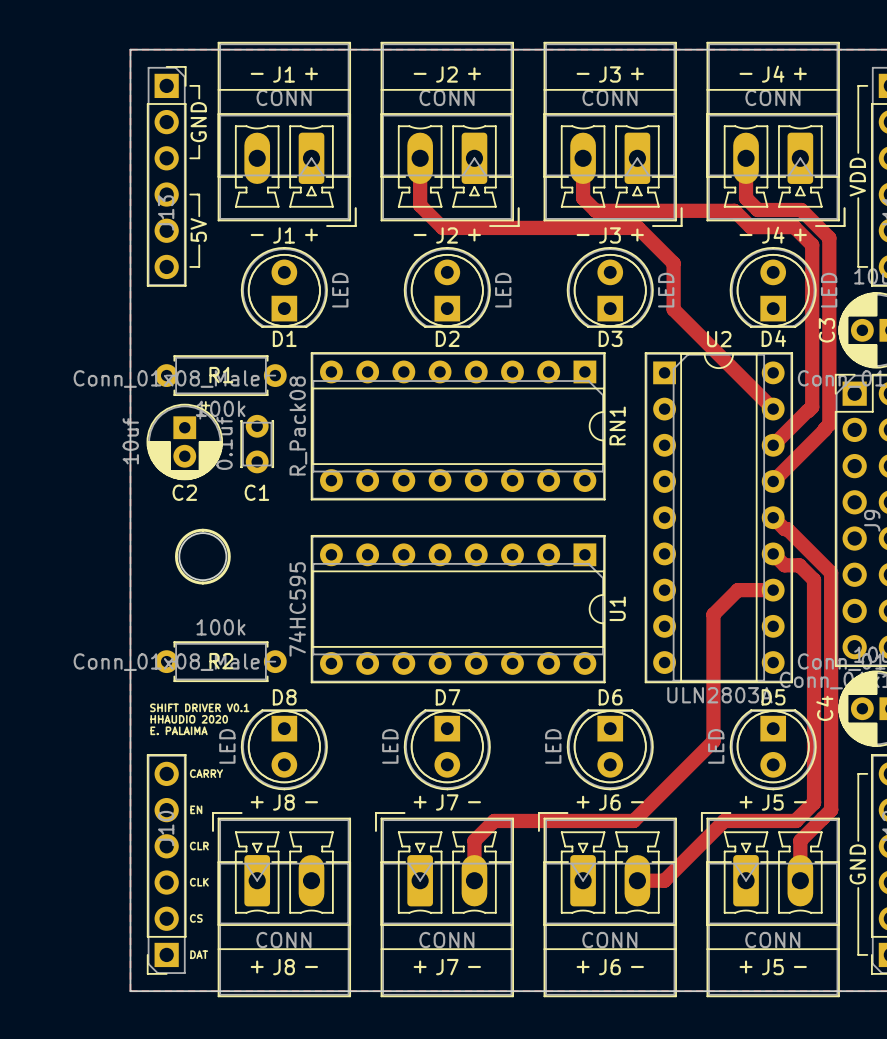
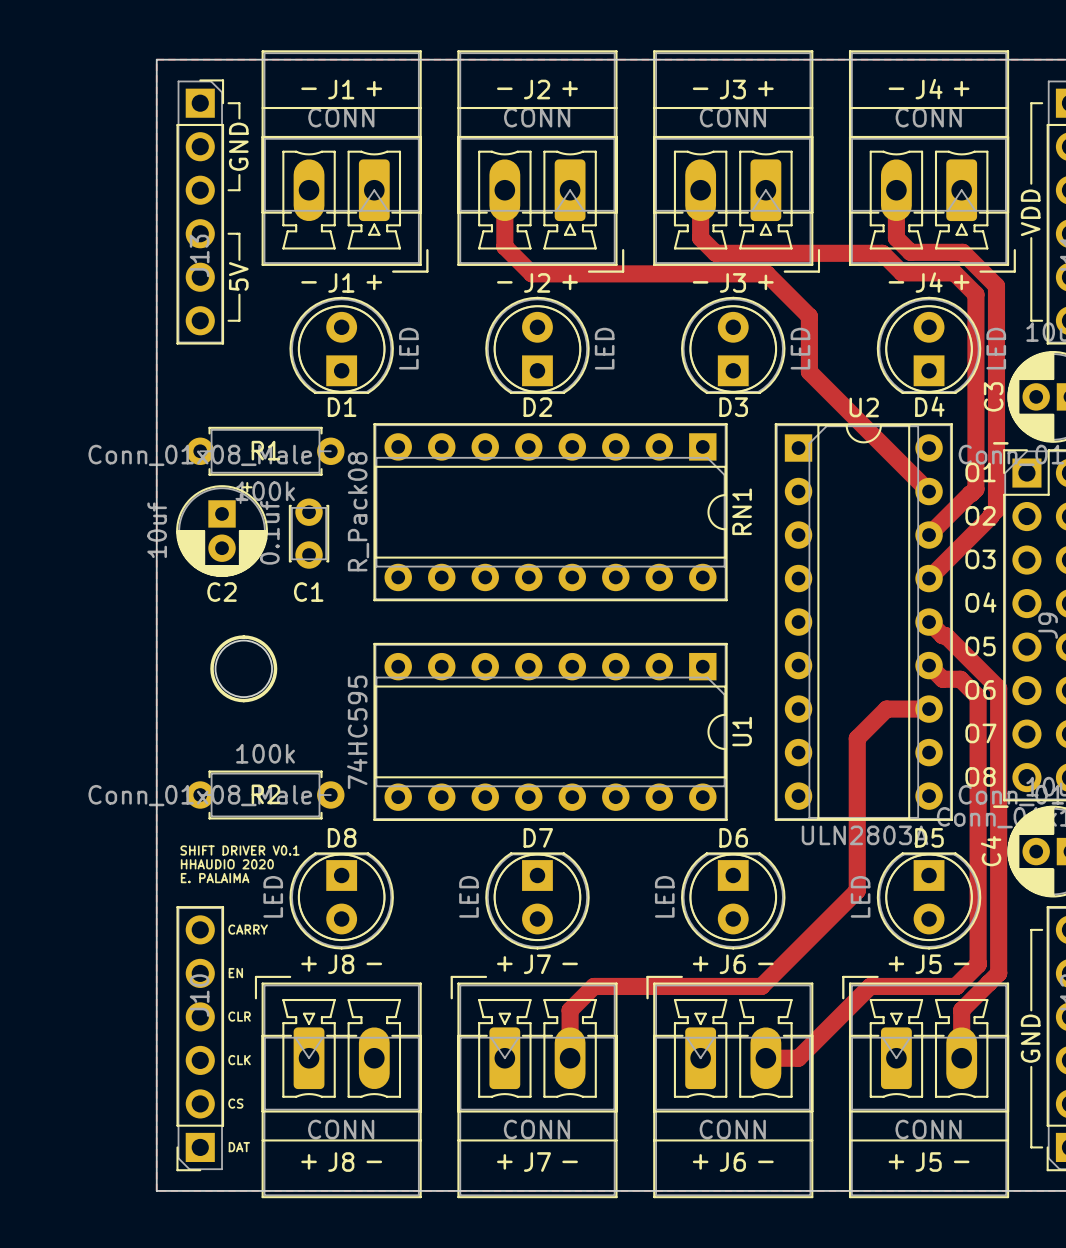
text: none -> - (1000, 443)
text: none -> O1 (980, 472)
text: none -> O2 (980, 515)
text: none -> O3 (980, 559)
text: none -> O4 (980, 602)
text: none -> O5 (980, 646)
text: none -> O6 (980, 689)
text: none -> O7 (980, 733)
text: none -> O8 (980, 776)
text: none -> - (1000, 806)

